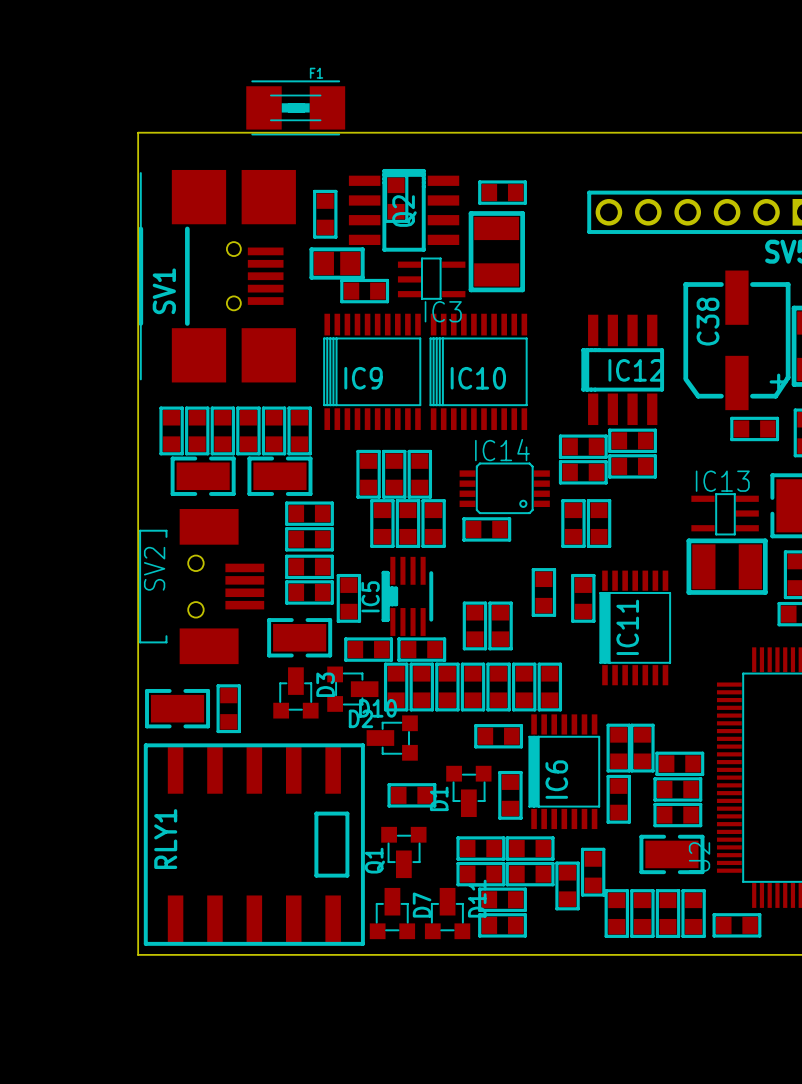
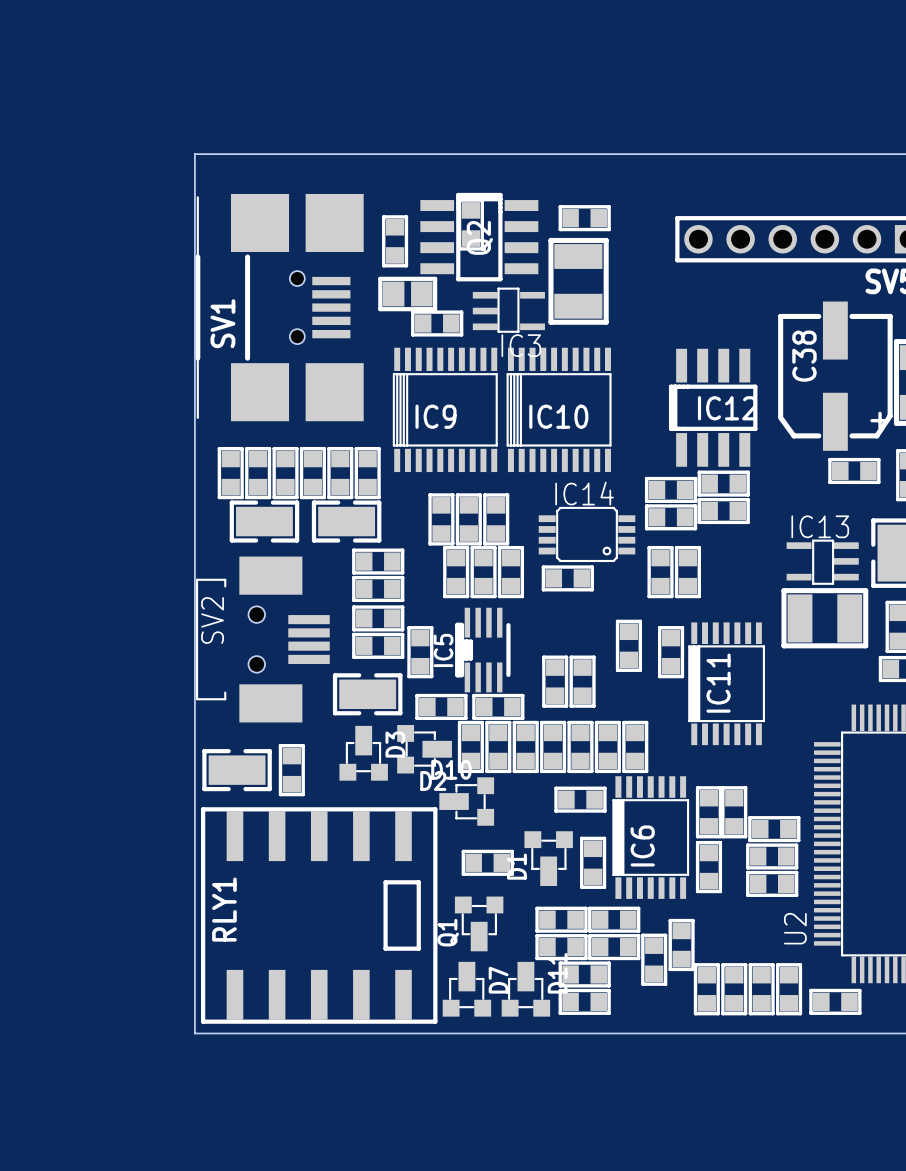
F1: (295, 107) -> none
part: (671, 854) -> none

